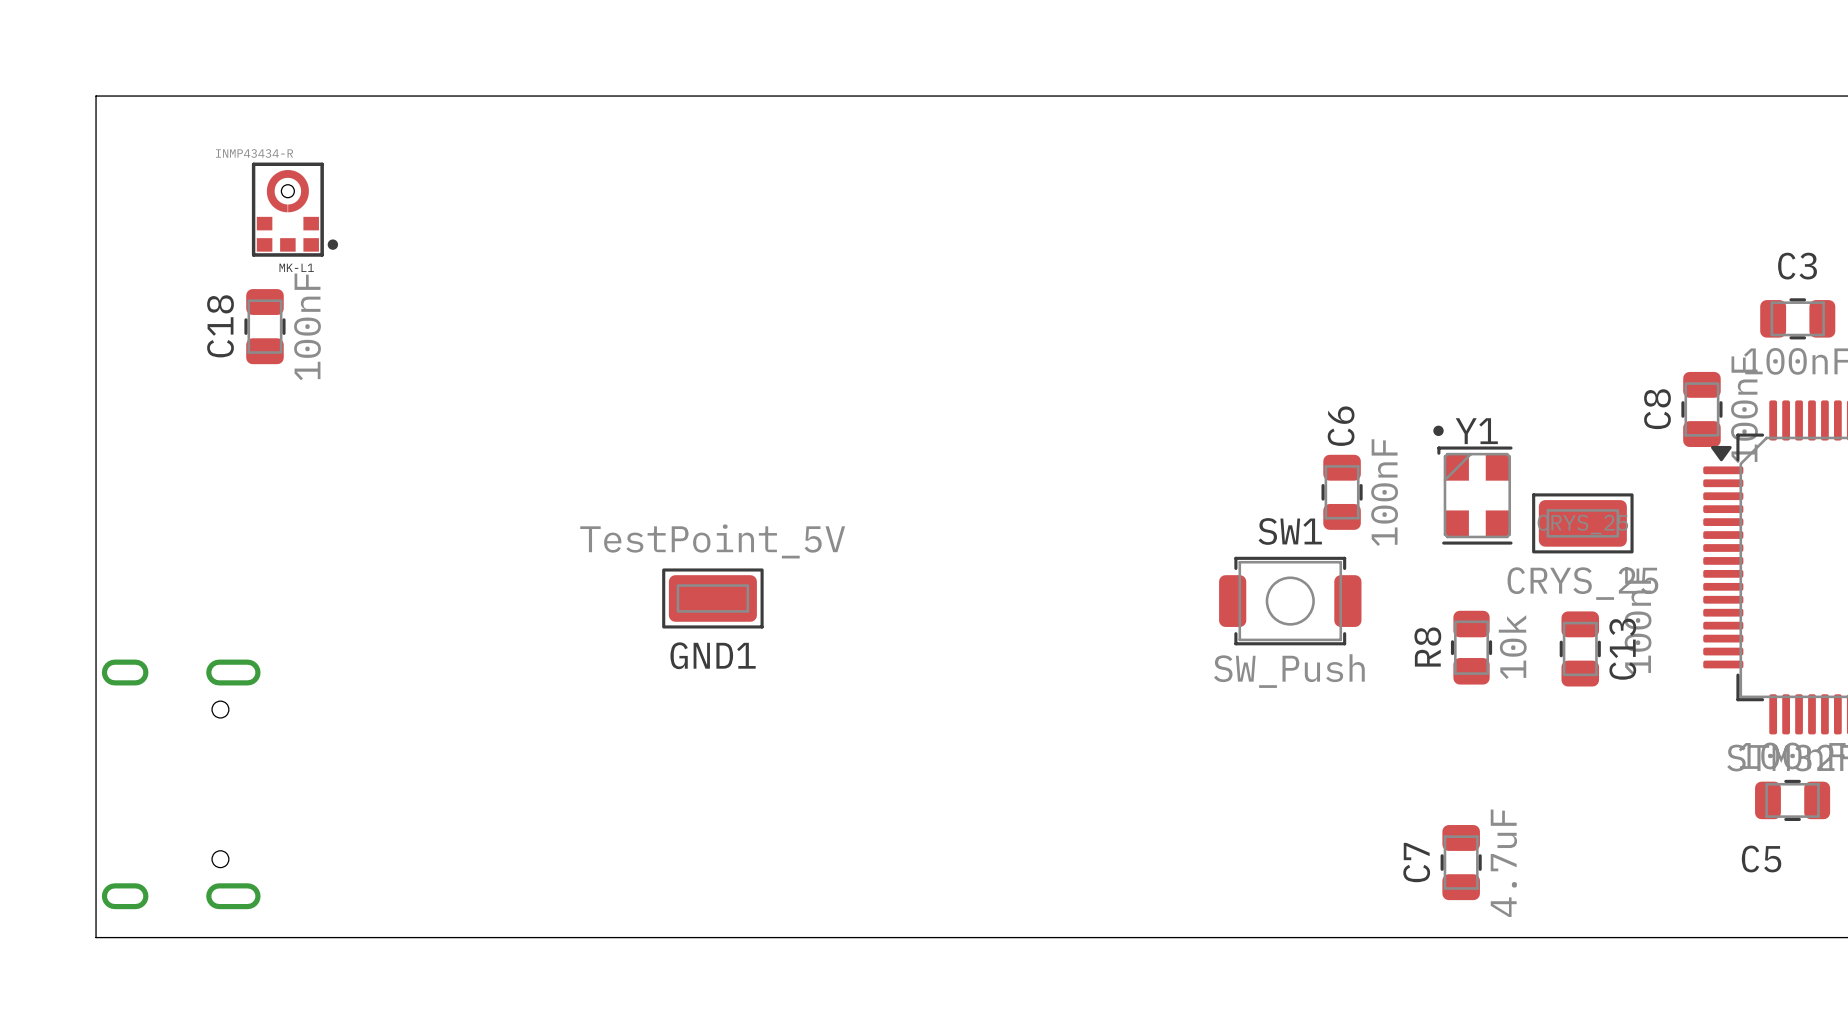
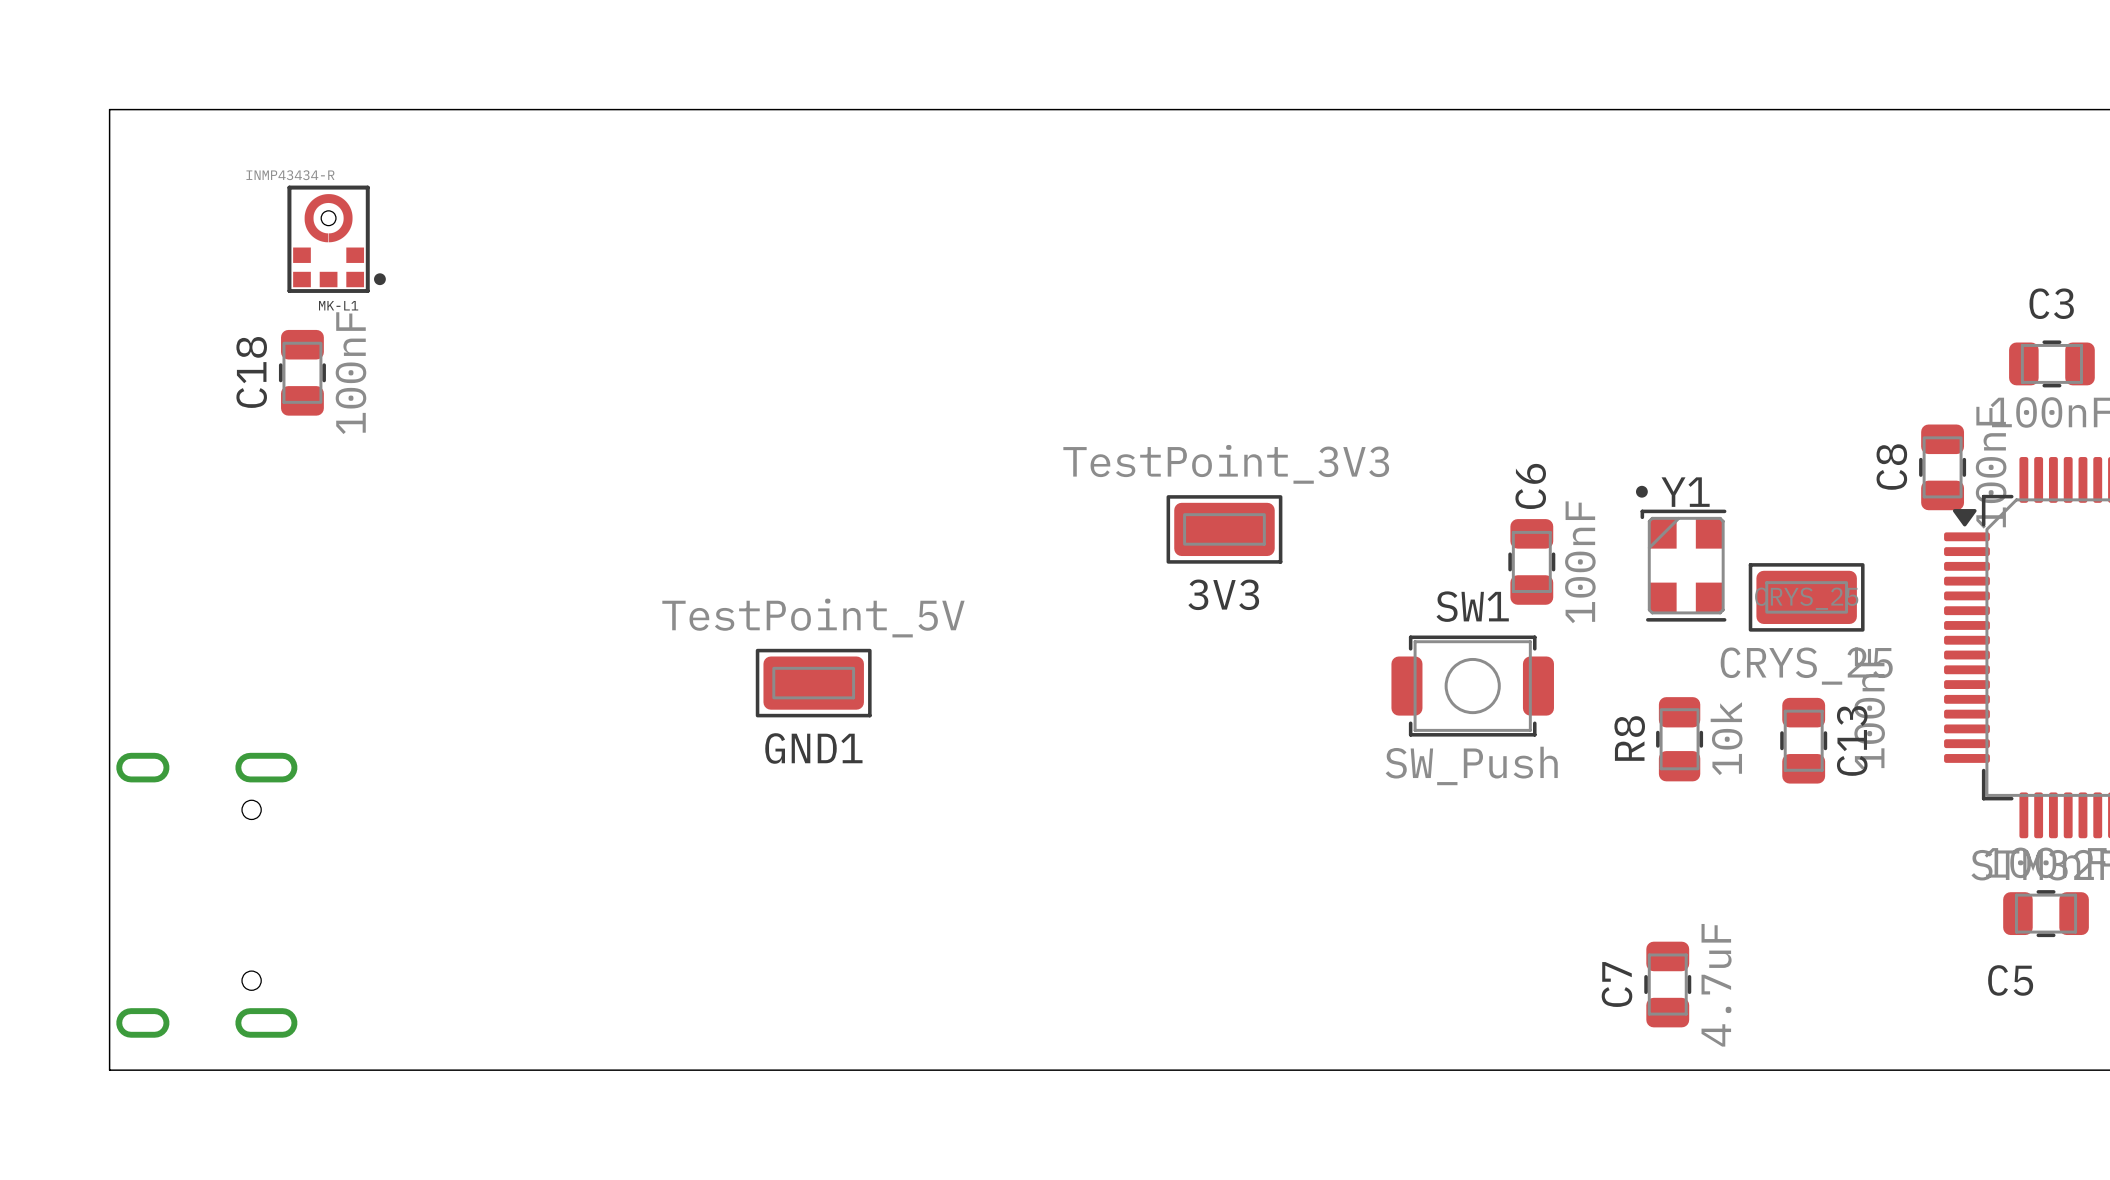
3V3: none -> TestPoint_3V3 (1224, 529)

